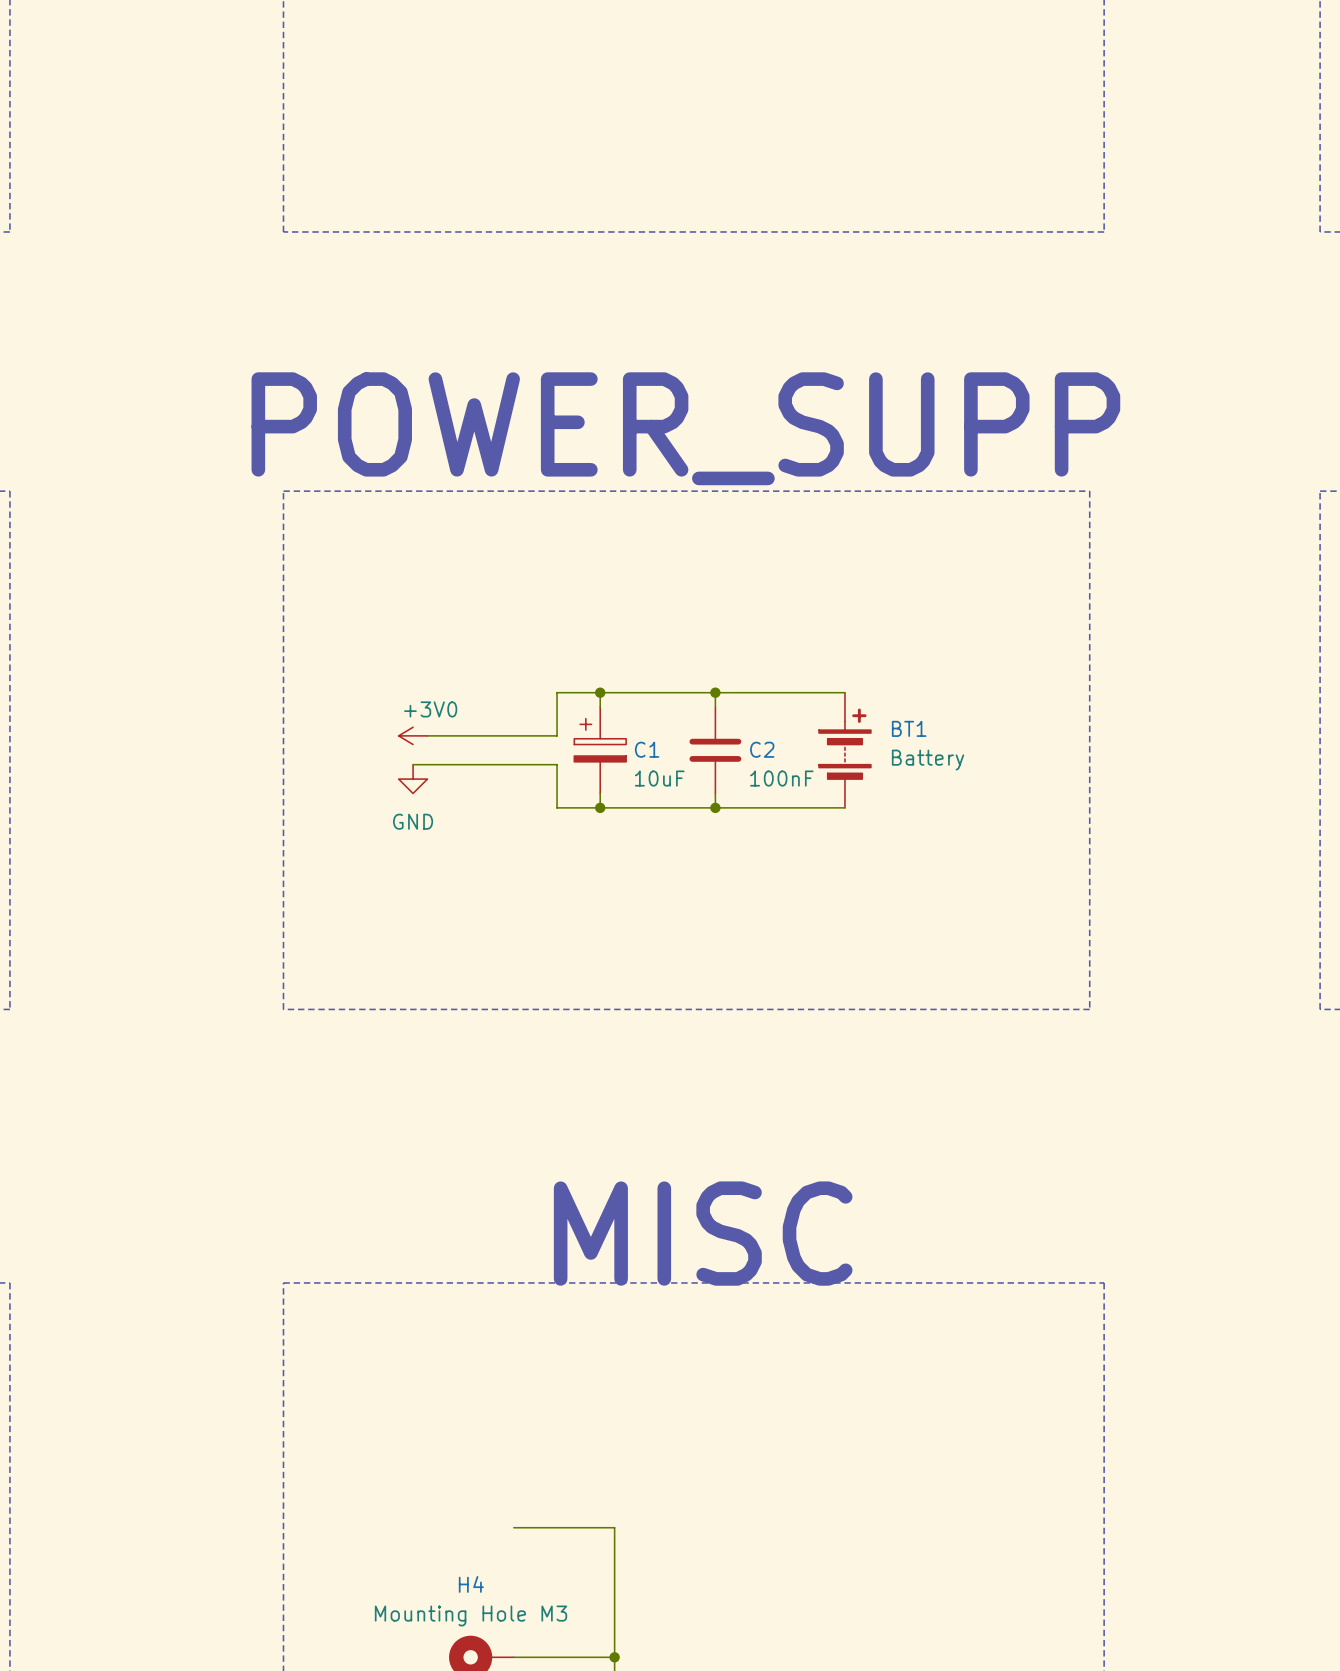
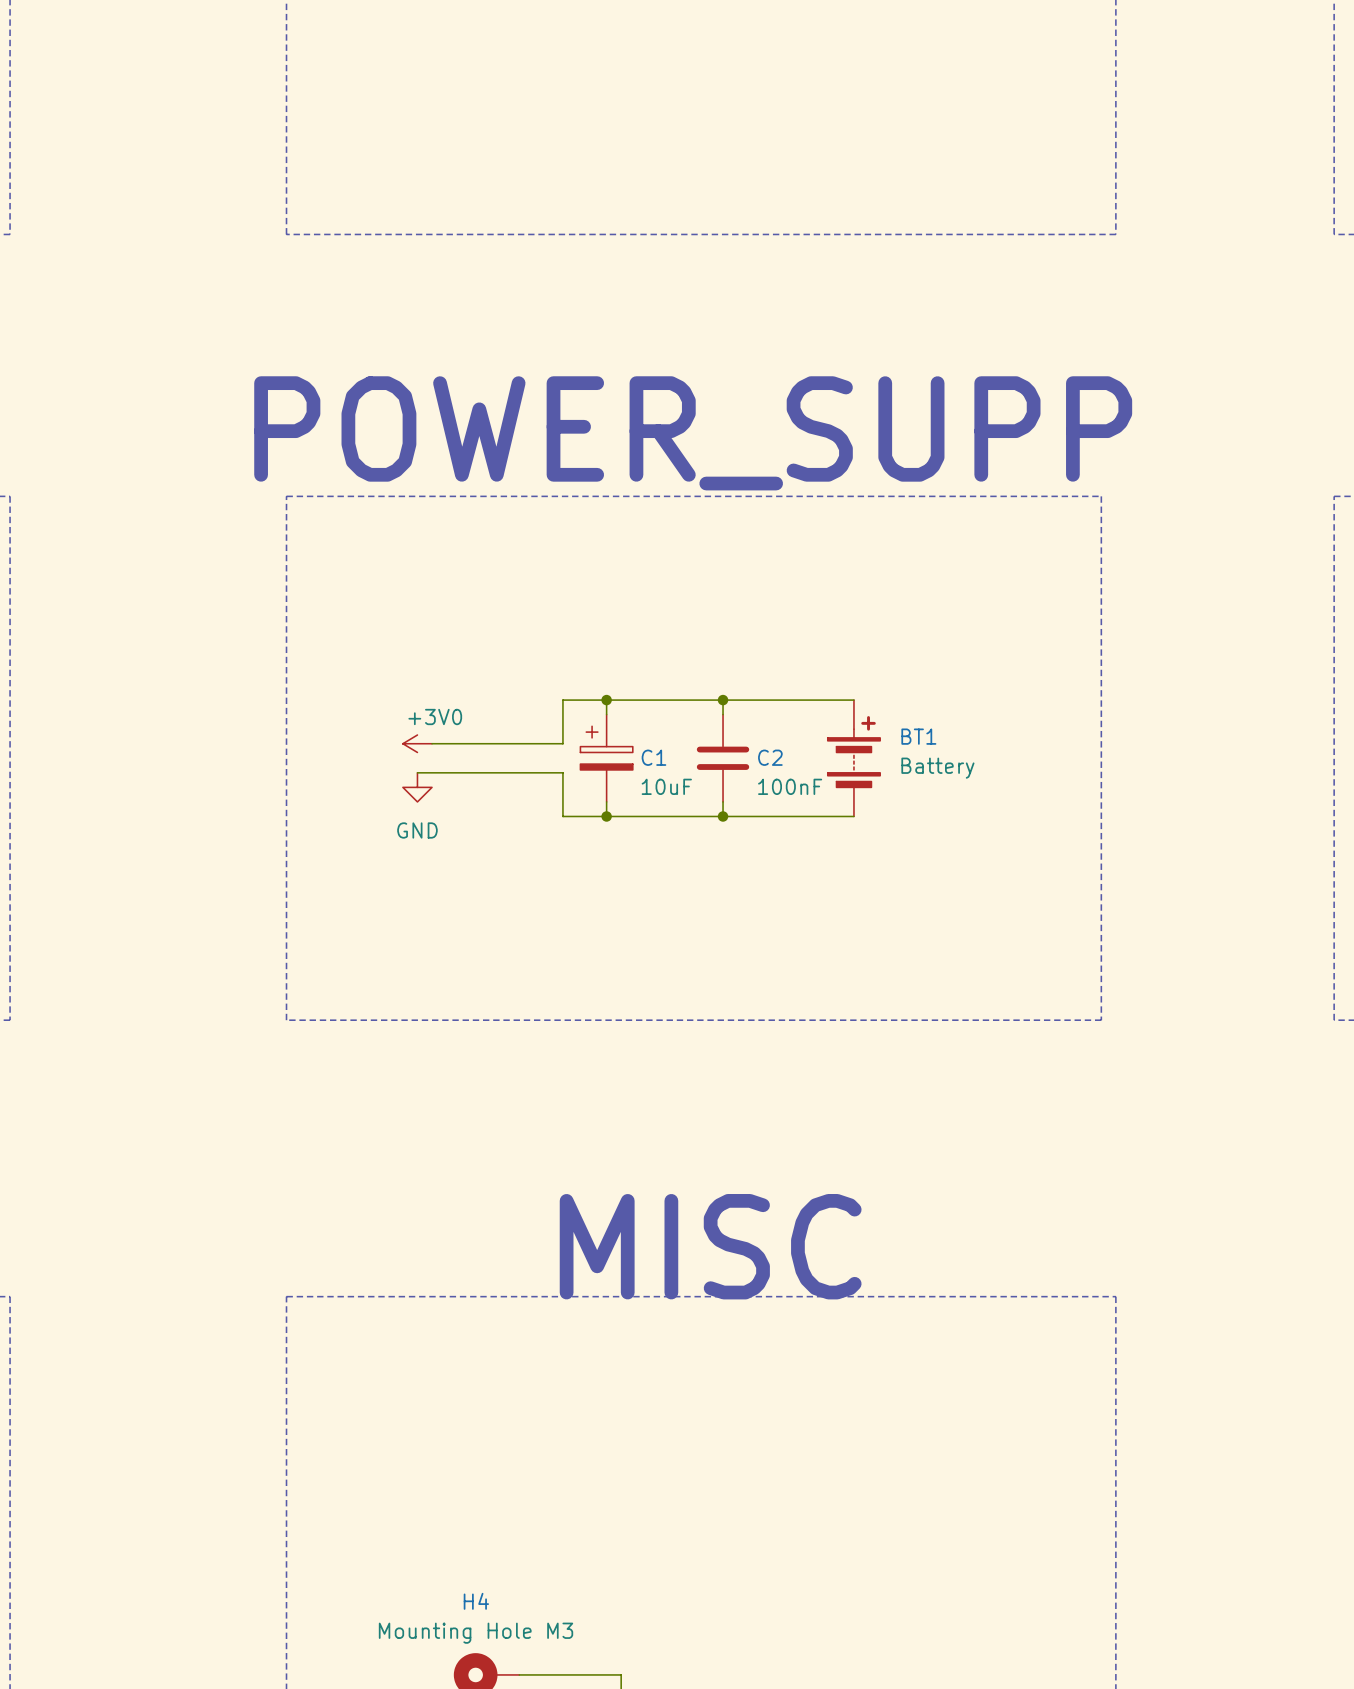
wire: (513, 1527) (614, 1527) (614, 1657) -> none
junction: (614, 1657) -> none

